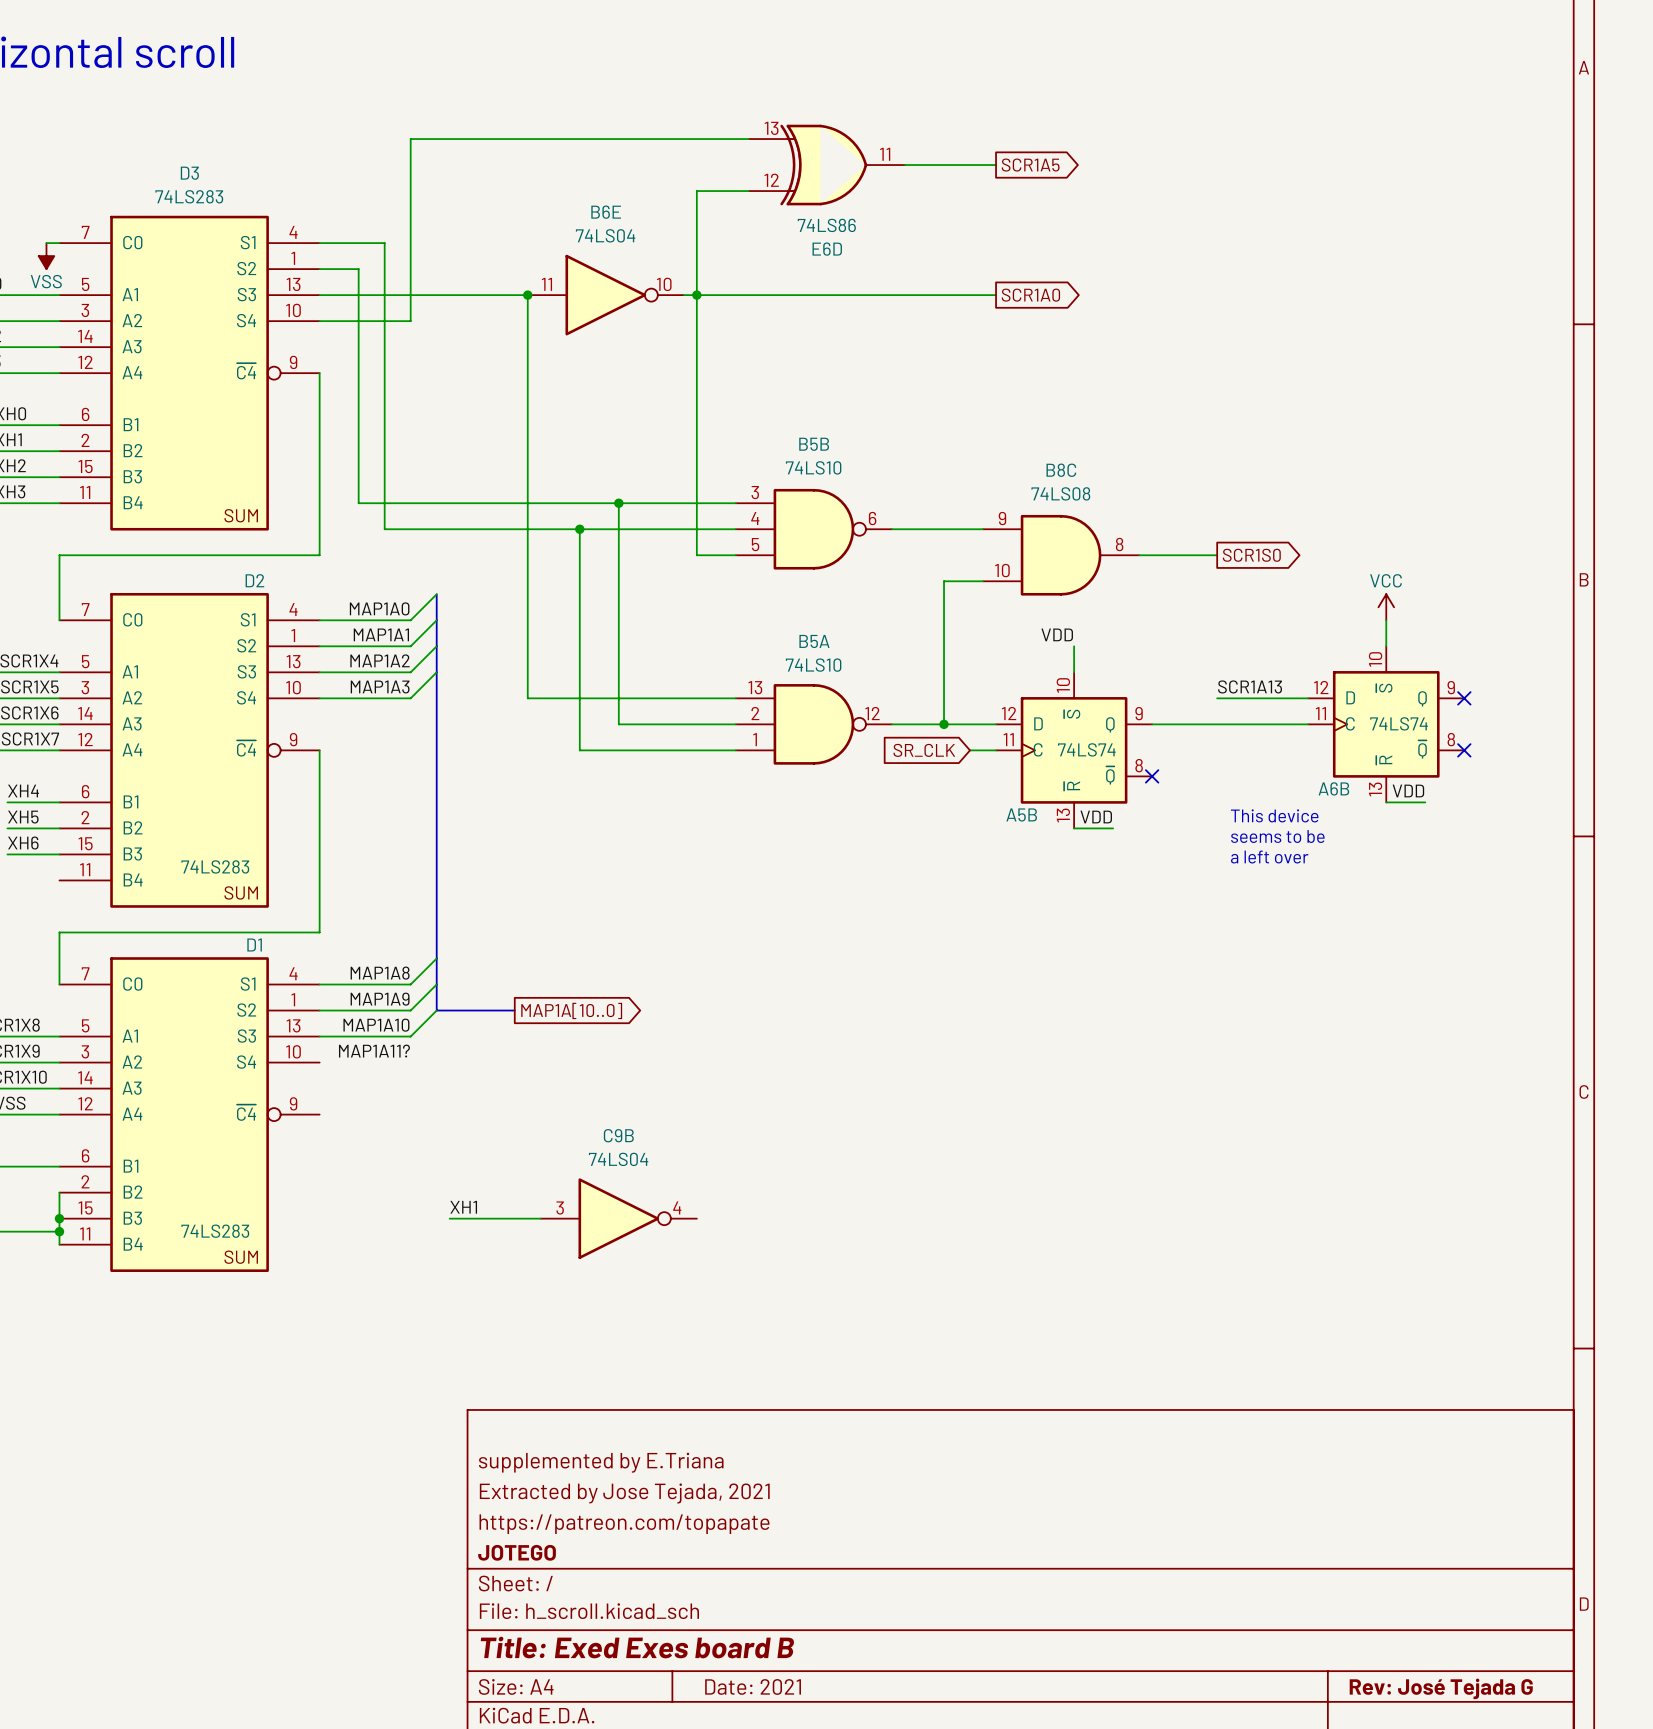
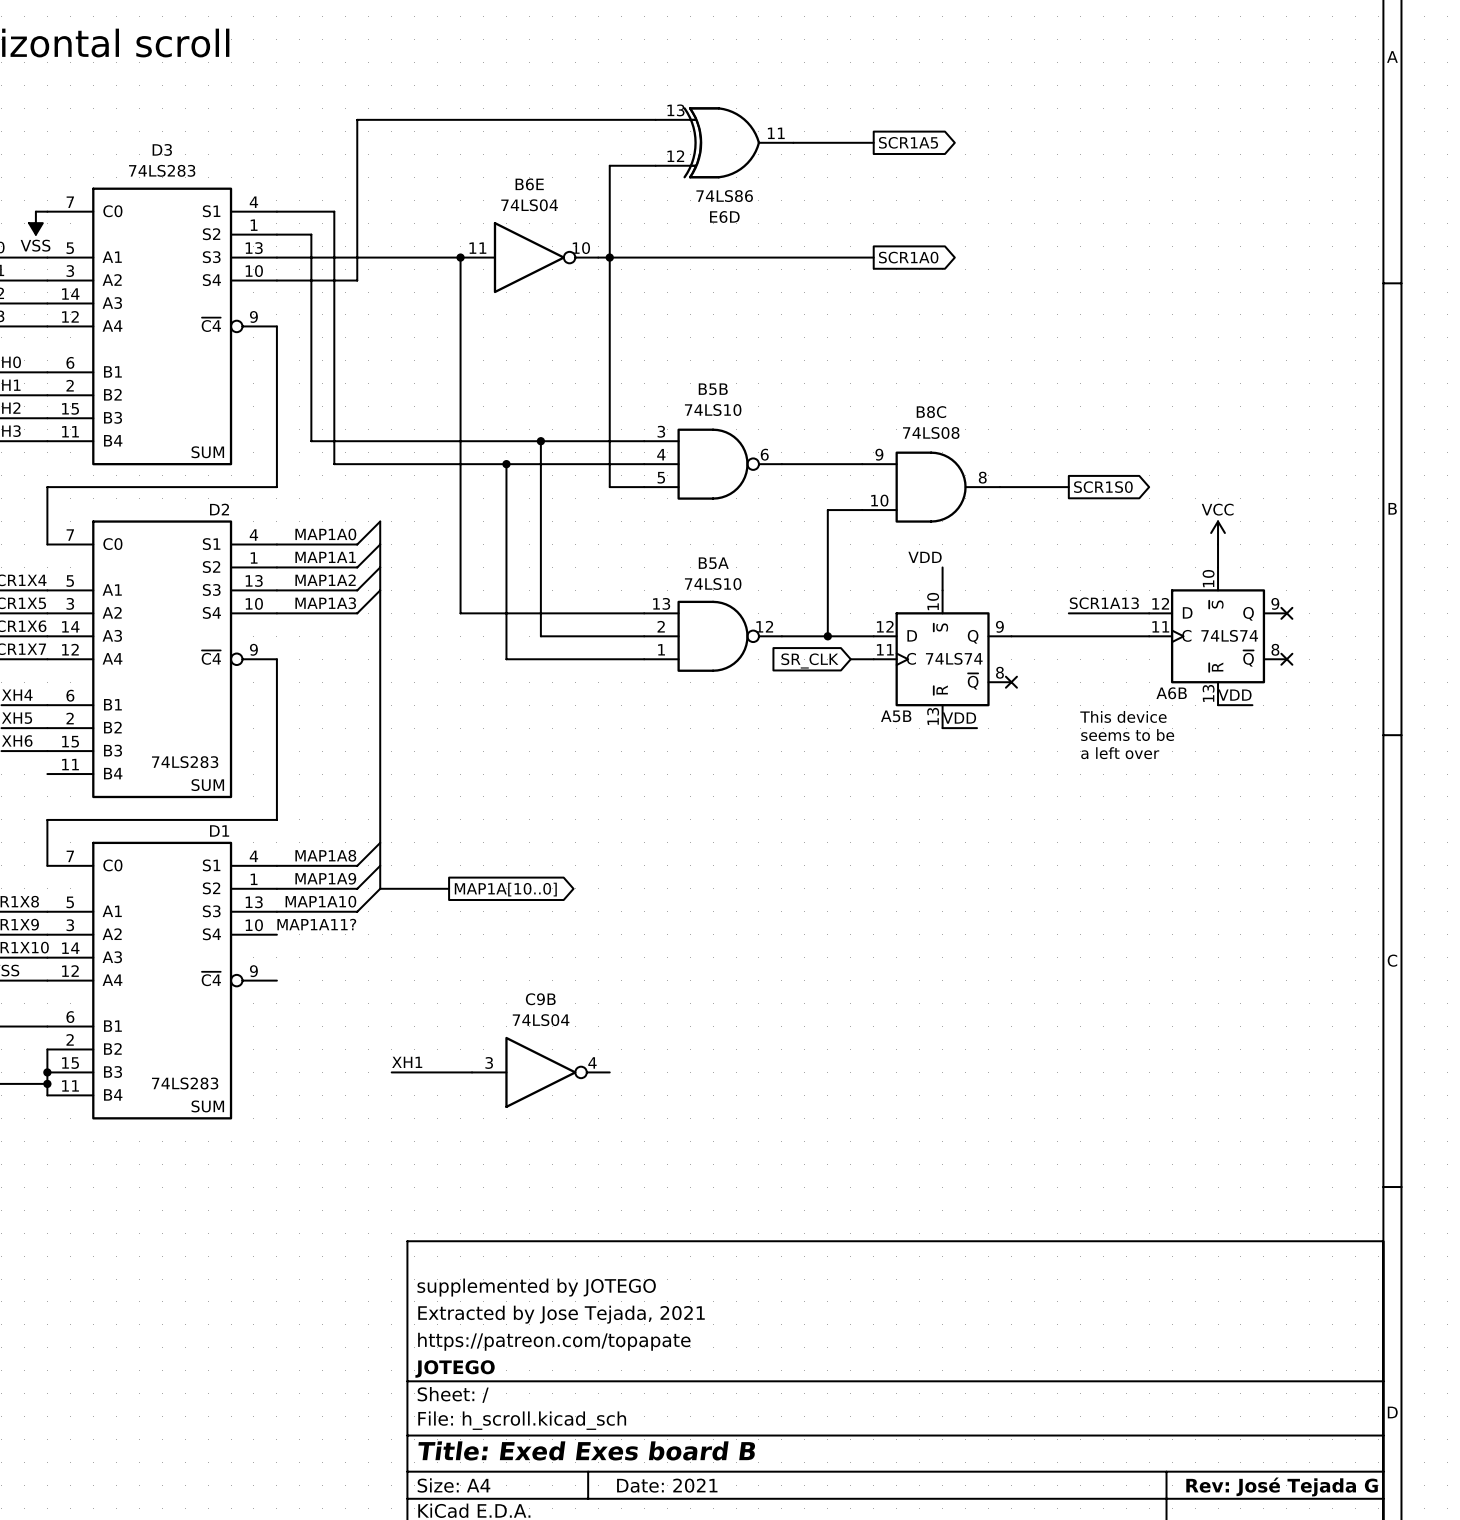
title block: supplemented by E.Triana (601, 1462) -> supplemented by JOTEGO (536, 1287)

